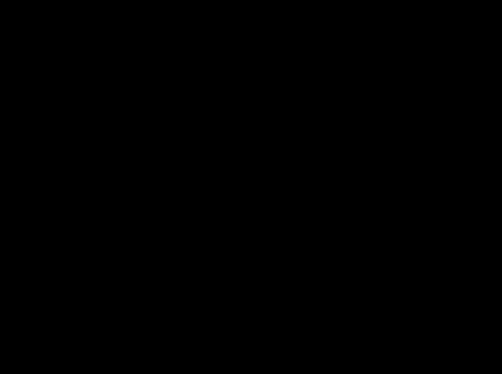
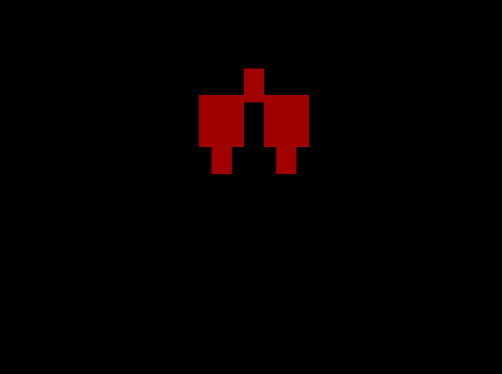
part: none -> (254, 121)
part: none -> (254, 121)

